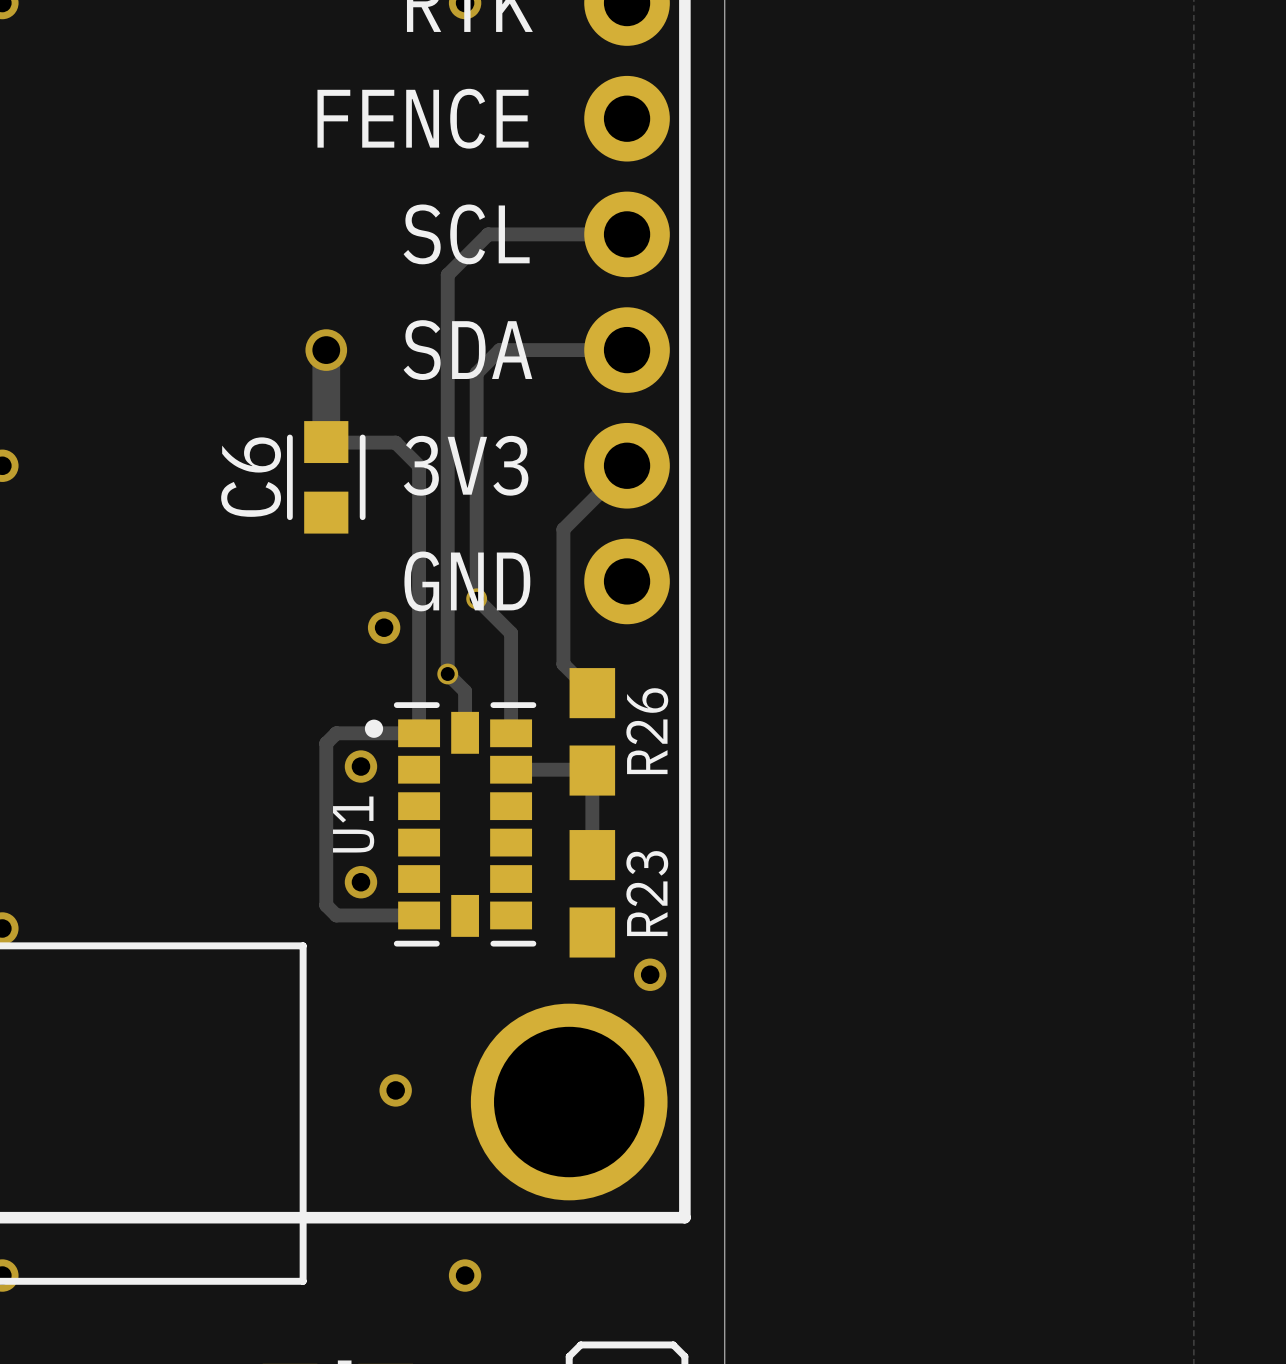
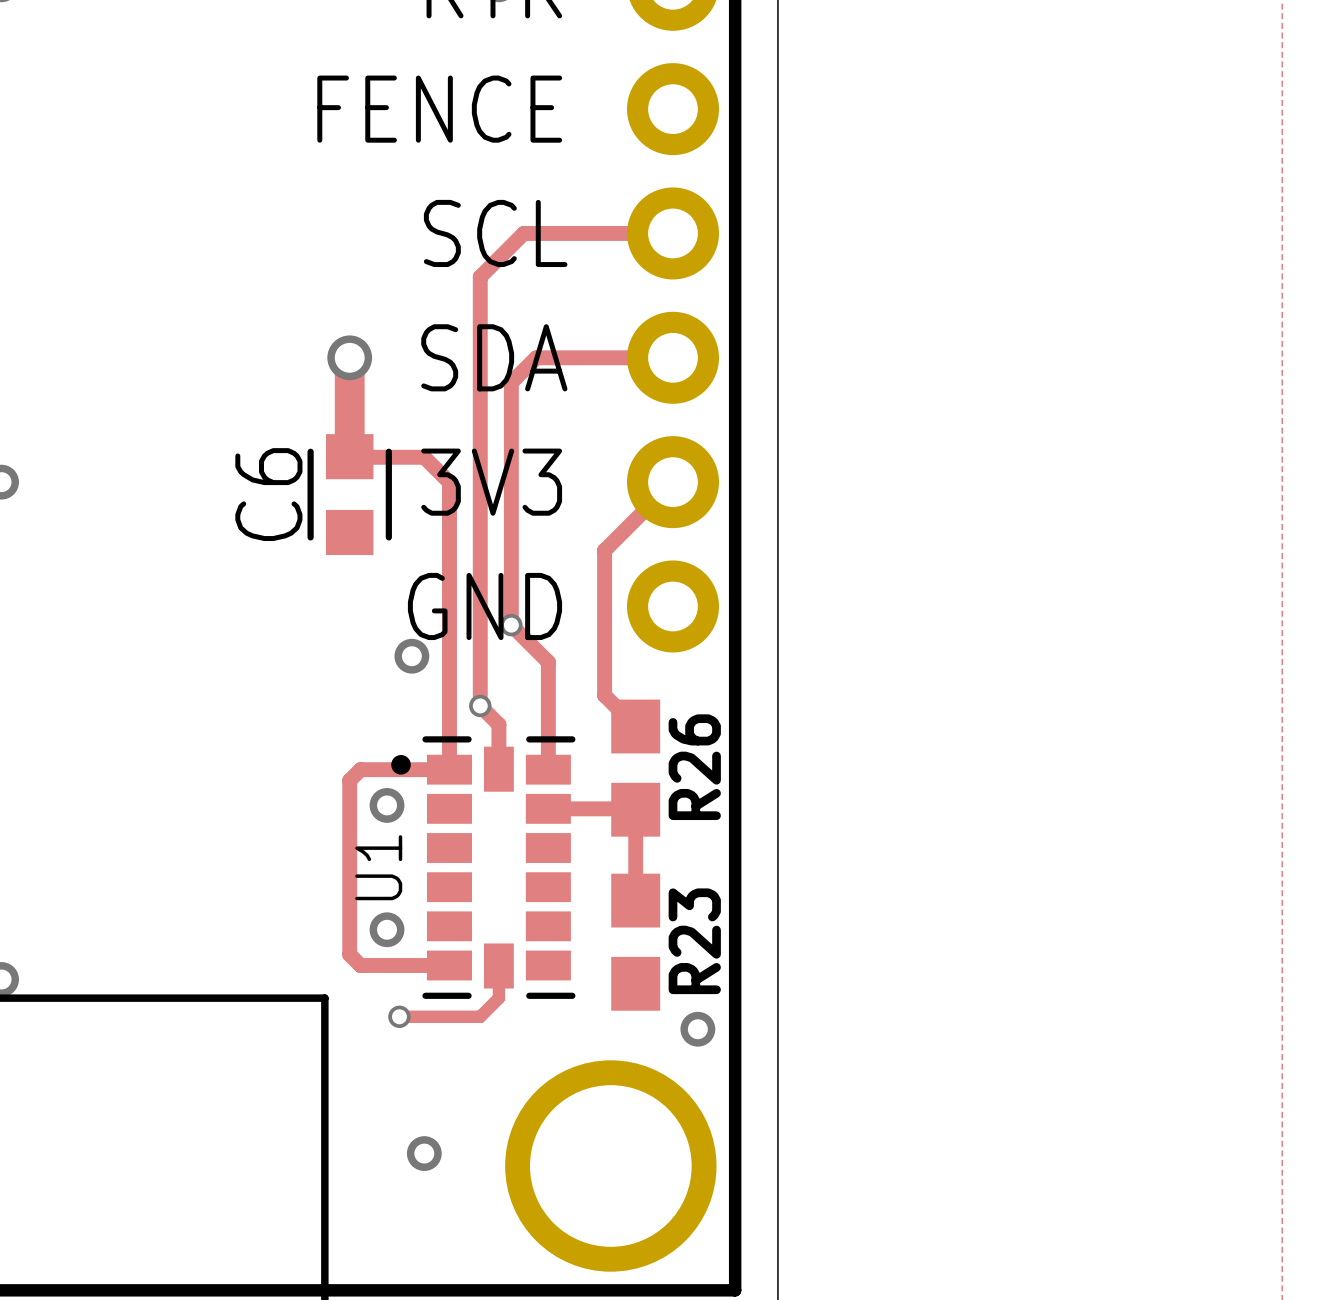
track: none -> (498, 965) (498, 998) (480, 1016) (399, 1016)
via: none -> (399, 1016)

